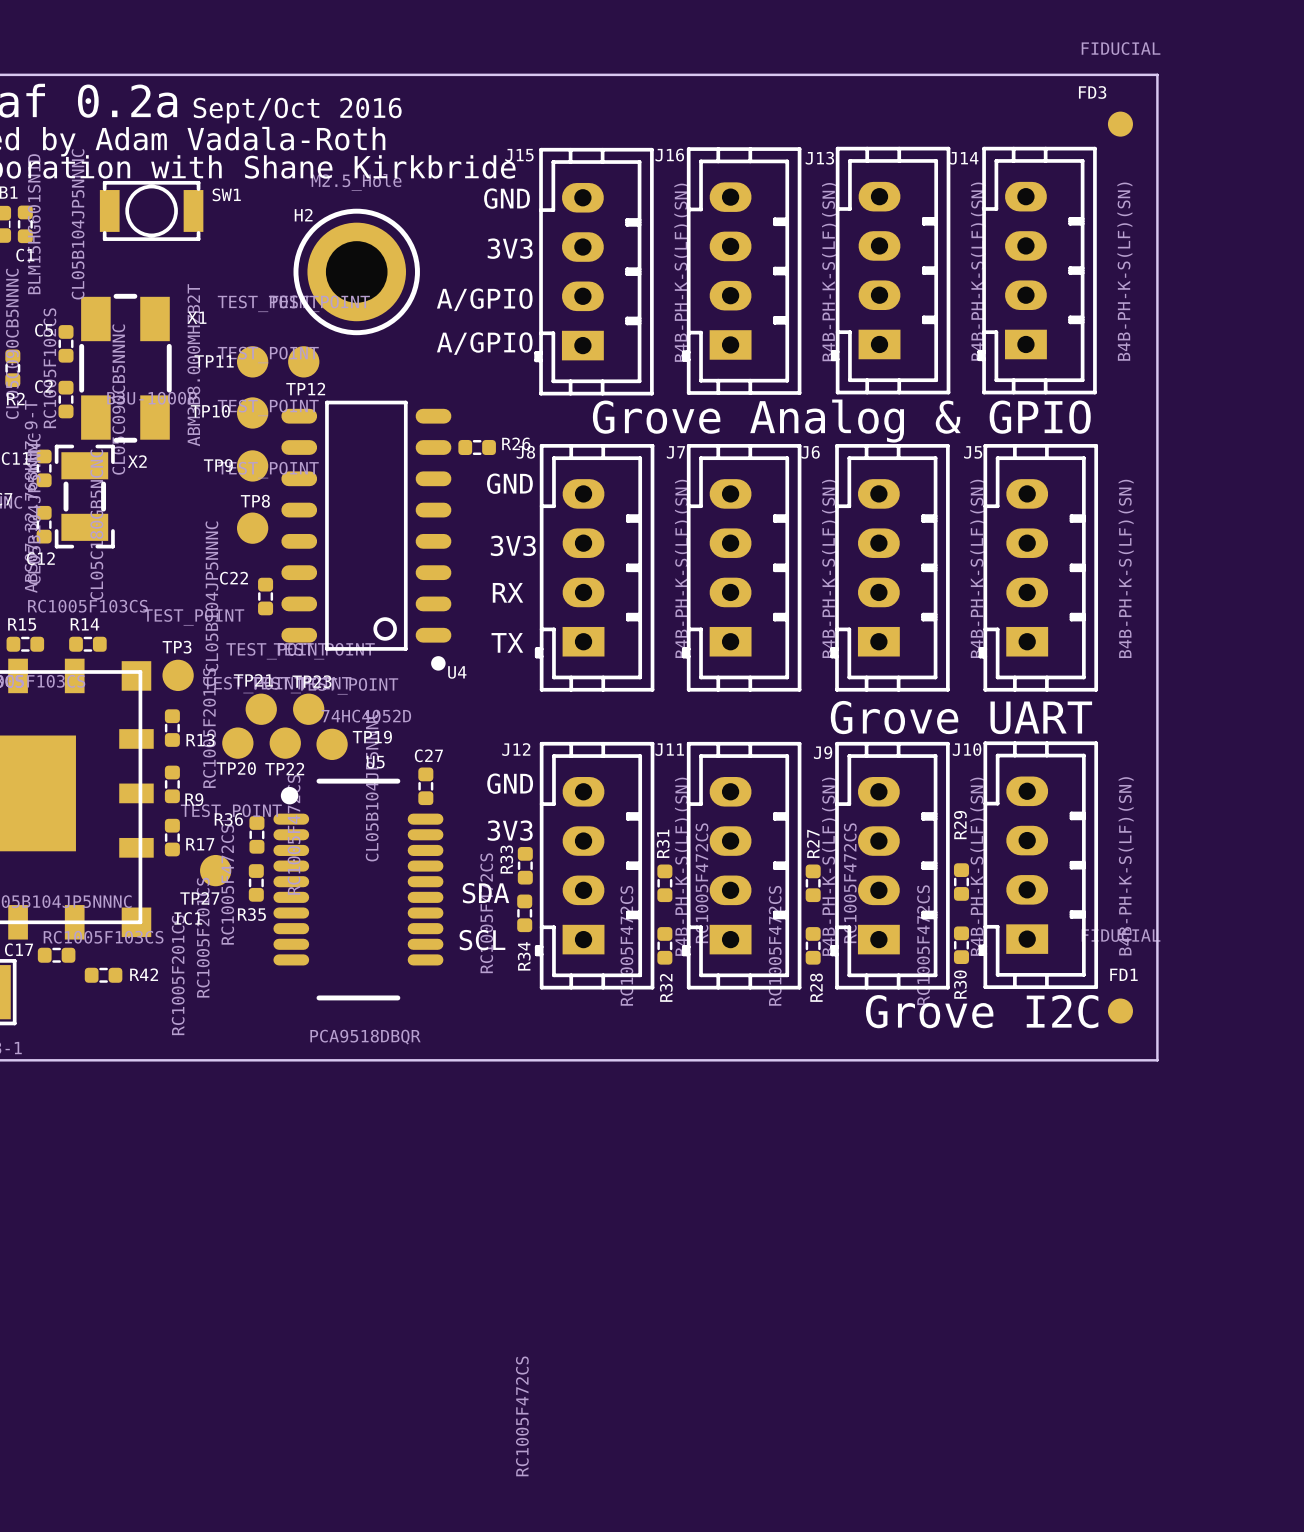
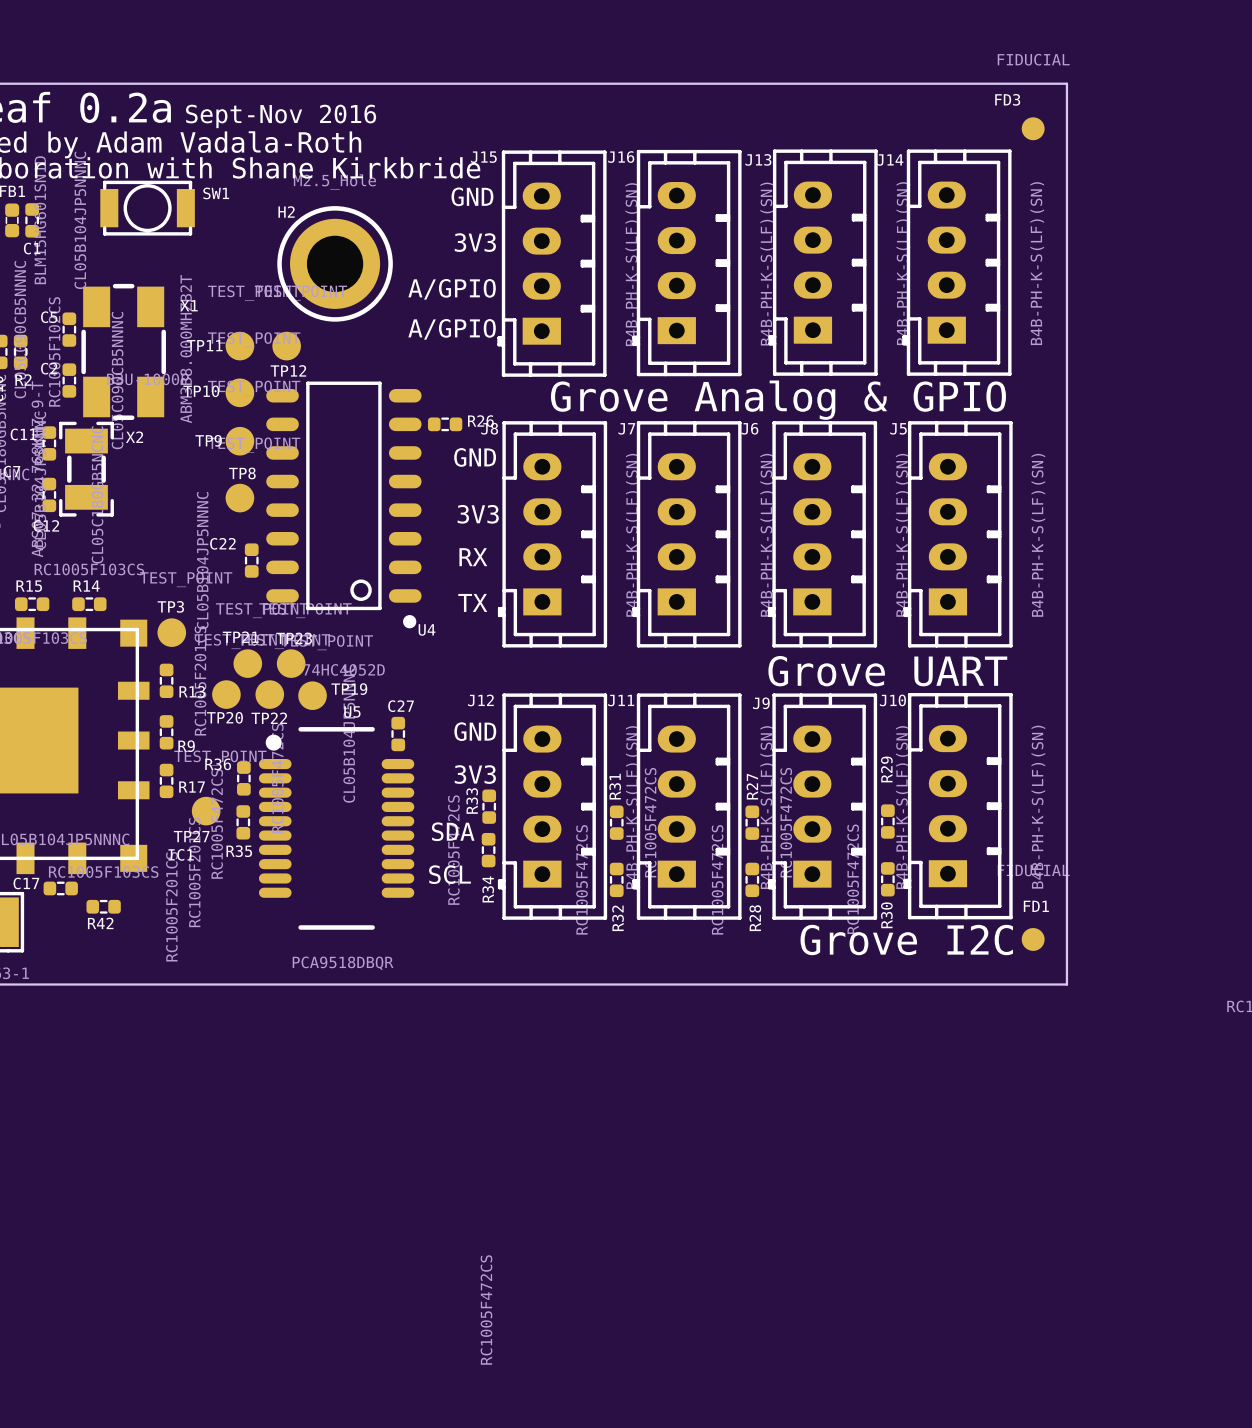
text: Sept/Oct 2016 (297, 110) -> Sept-Nov 2016 (281, 116)
R42 name position: R42 (144, 974) -> R42 (100, 923)

